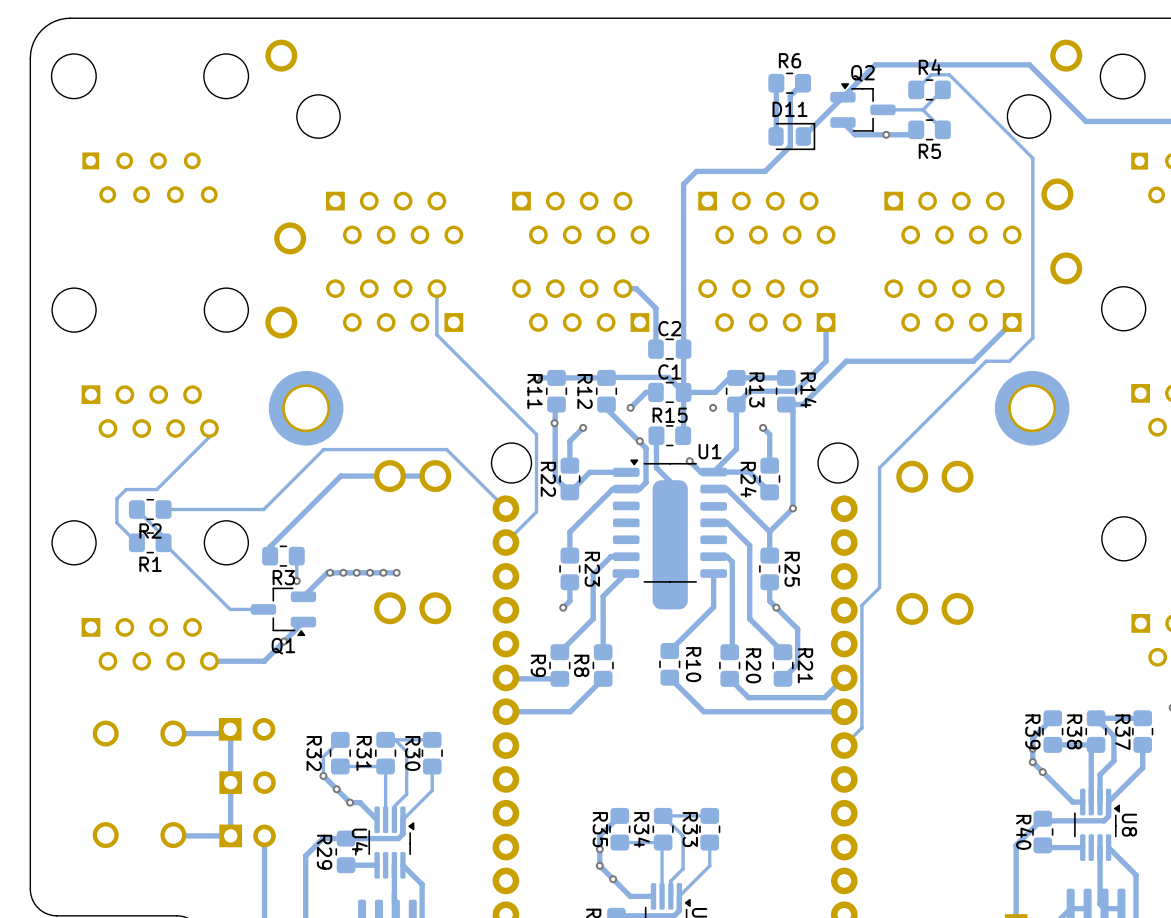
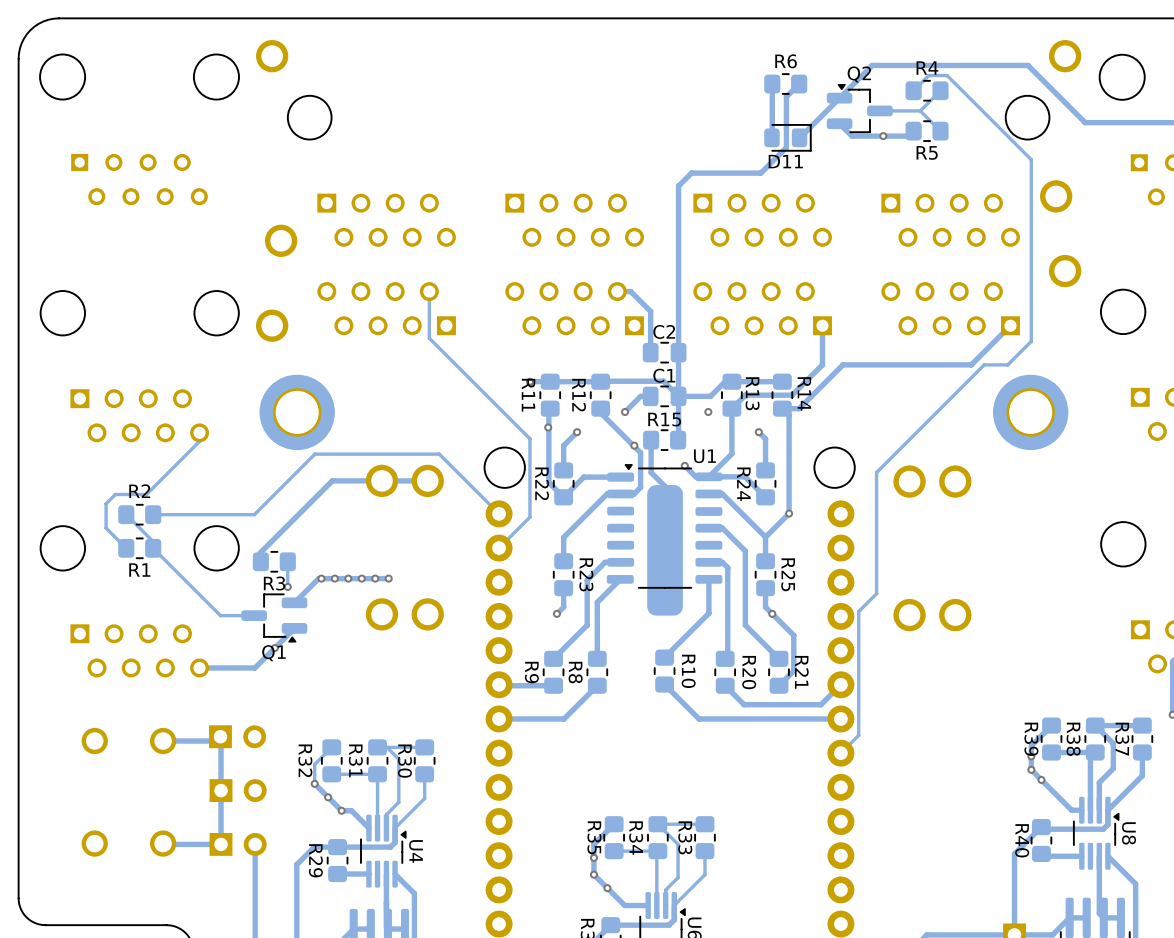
D11 name position: D11 (789, 109) -> D11 (785, 161)
R2 name position: R2 (150, 531) -> R2 (139, 491)
U4 name position: U4 (359, 840) -> U4 (416, 851)

